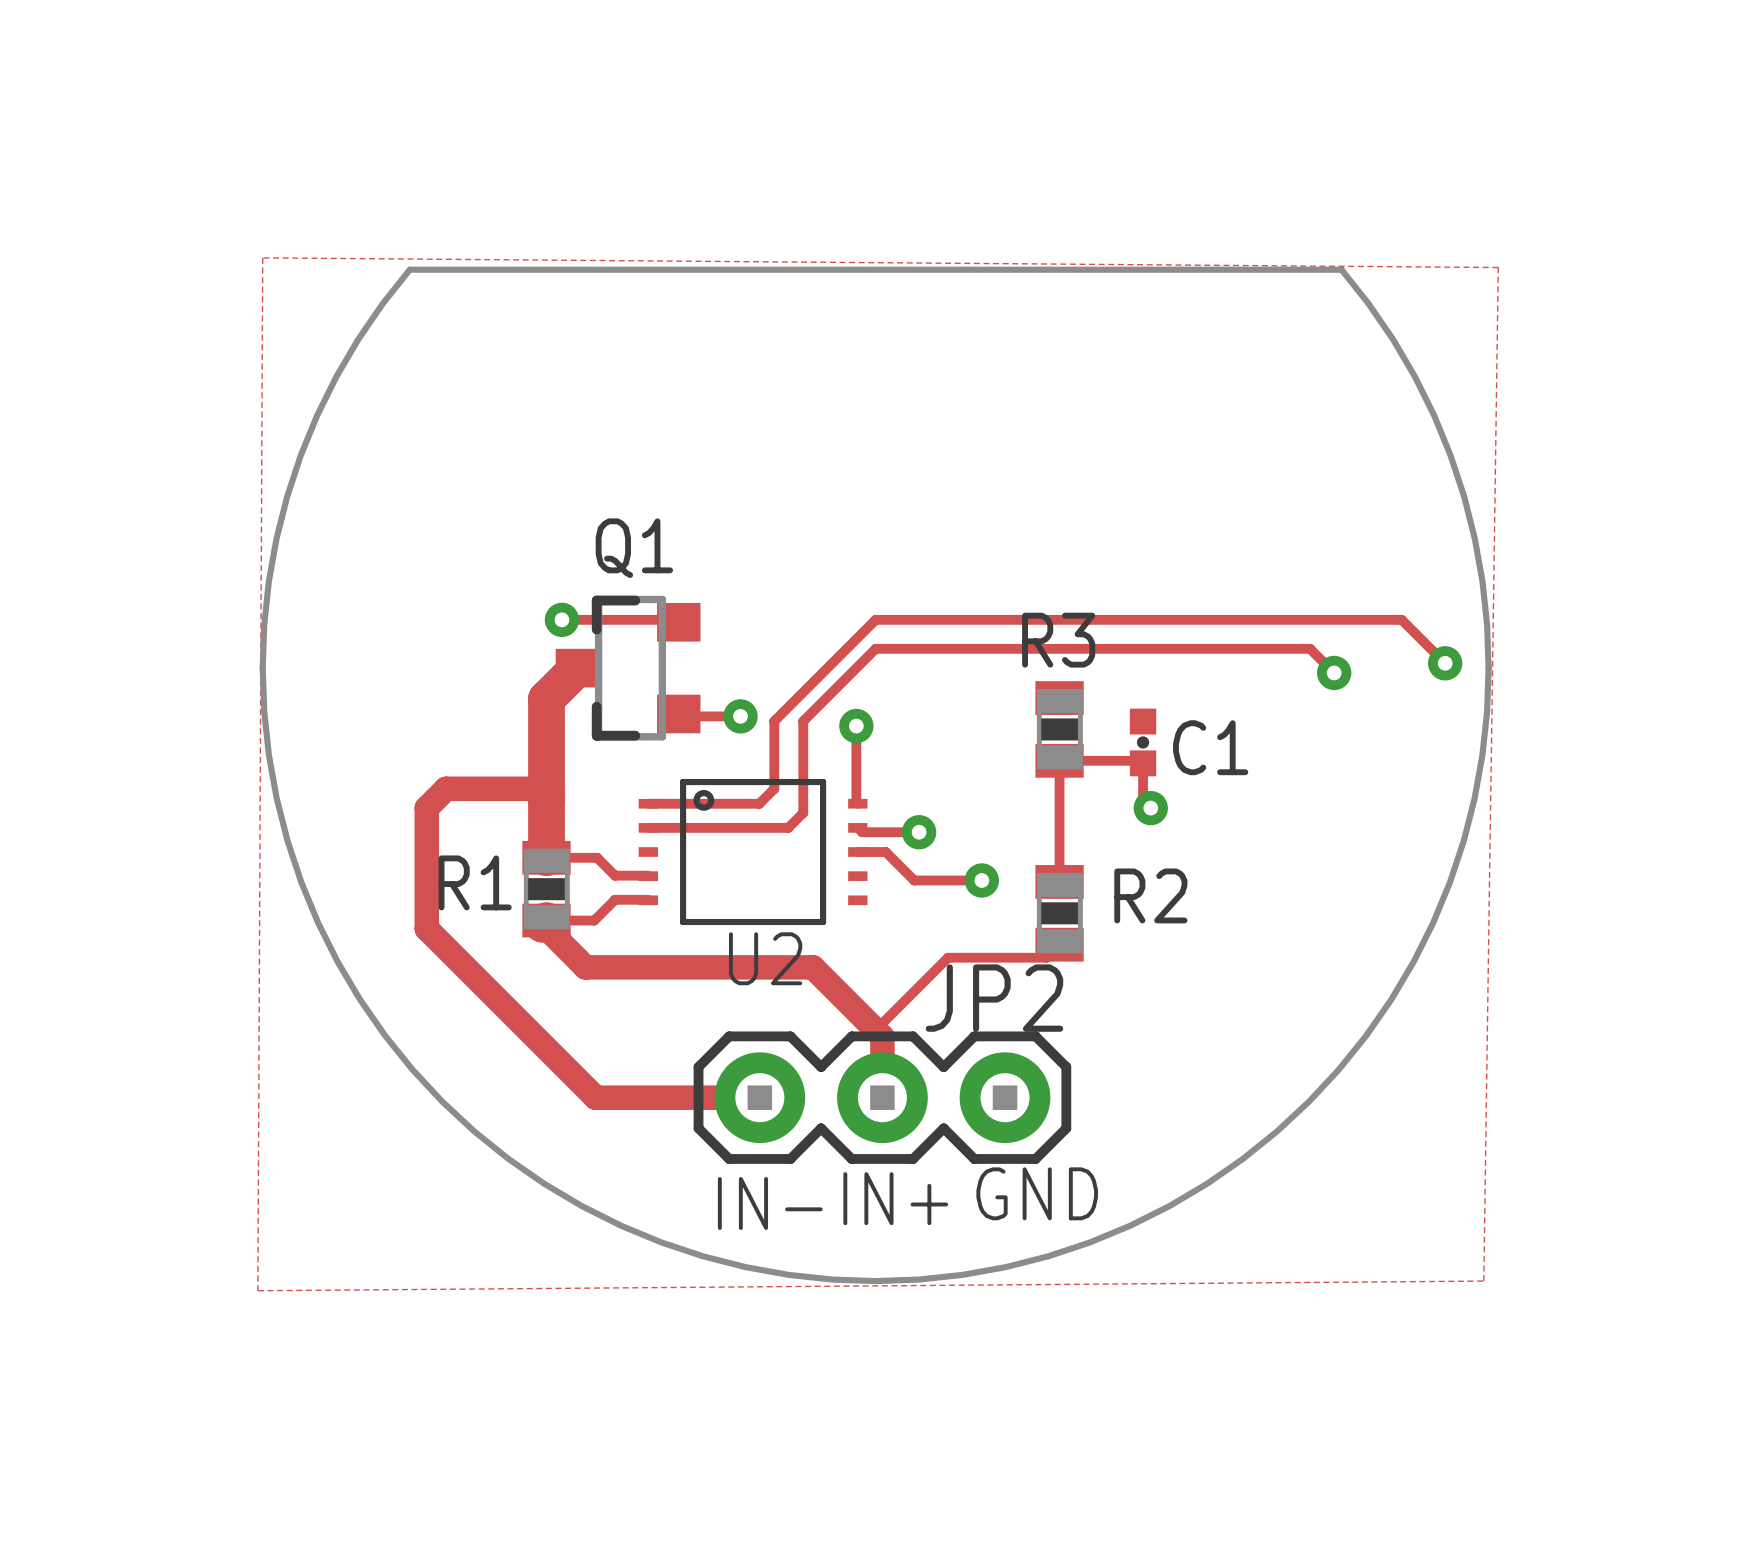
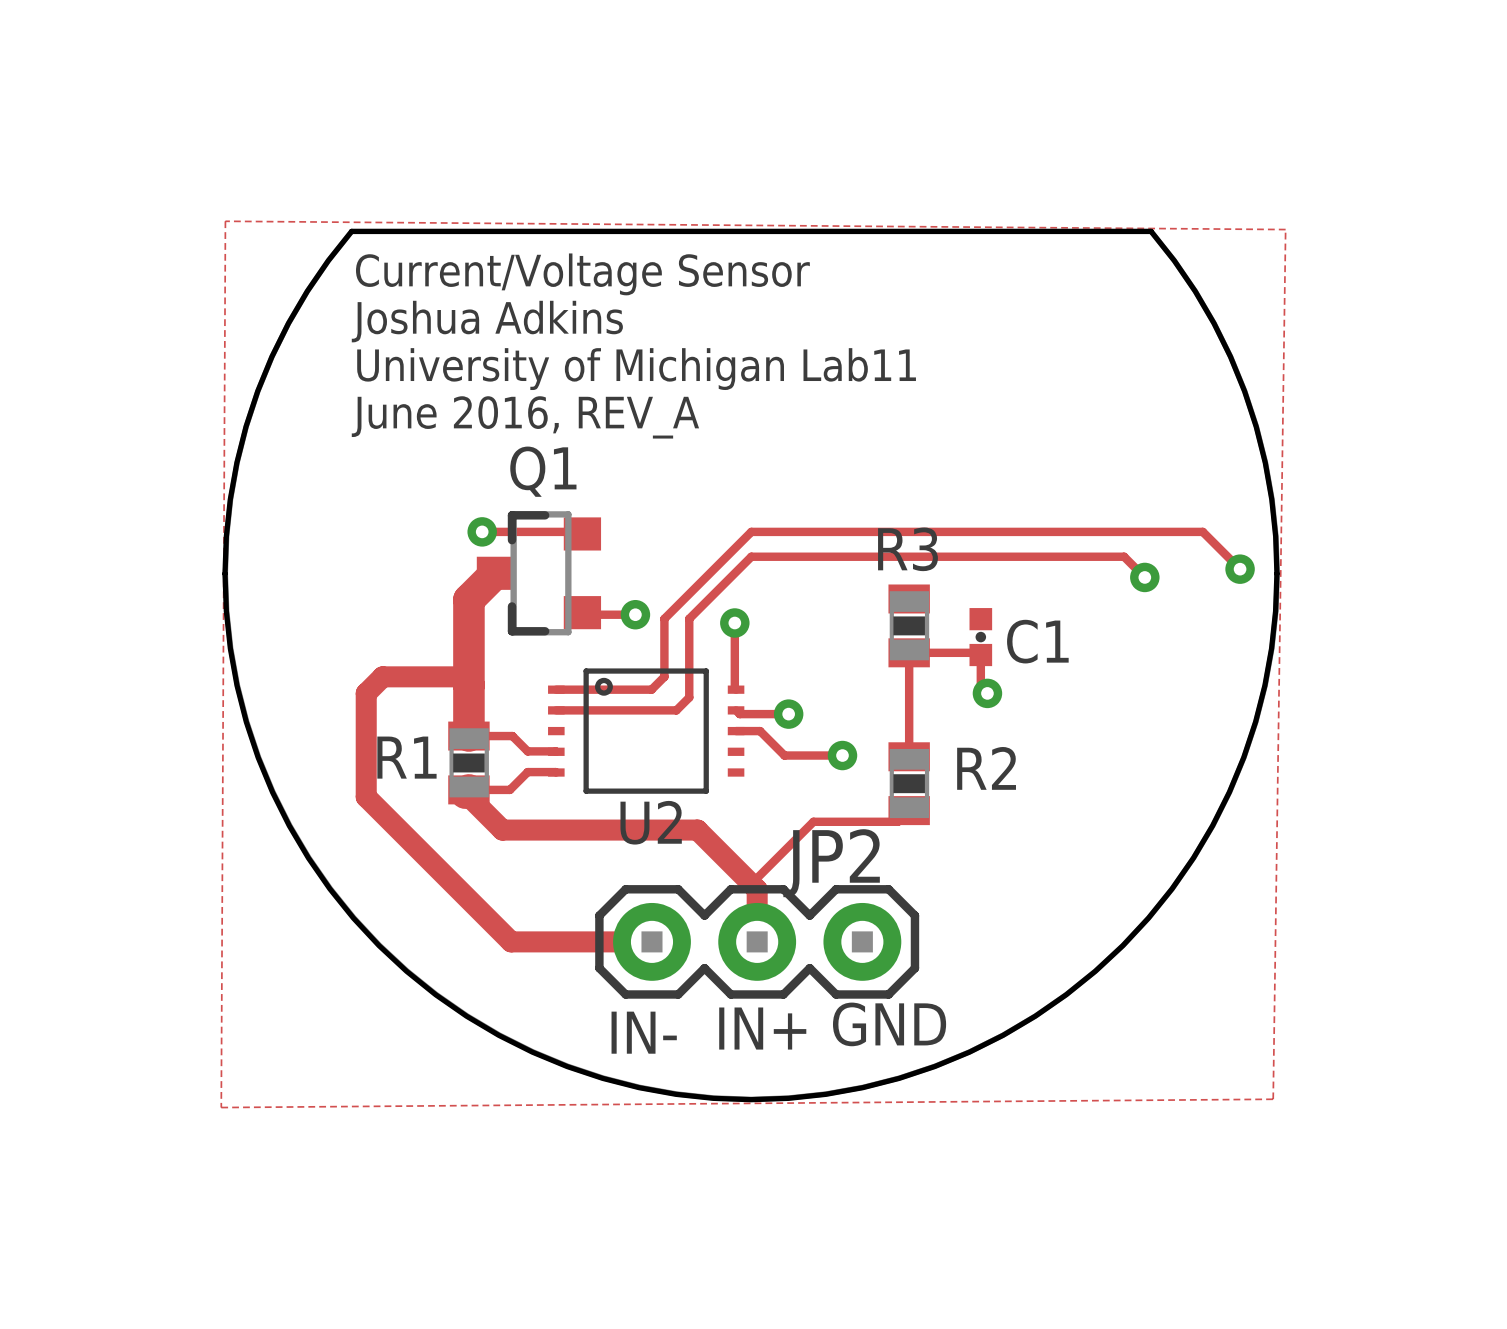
board edge: none -> (351, 231) (1151, 231) (1195, 291) (1214, 323) (1244, 391) (1265, 462) (1275, 536) (1276, 573) (1275, 611) (1264, 685) (1243, 757) (1212, 825) (1172, 888) (1148, 918) (1122, 945) (1066, 994) (1003, 1035) (934, 1066) (899, 1078) (862, 1087) (788, 1098) (750, 1099) (676, 1094) (639, 1087) (567, 1066) (498, 1035) (435, 994) (406, 971) (379, 945) (329, 888) (289, 825) (258, 757) (246, 721) (237, 685) (226, 611) (226, 536) (230, 499) (246, 426) (271, 356) (288, 323) (307, 291) (351, 231)
text: none -> Current/Voltage Sensor (582, 274)
text: none -> Joshua Adkins (487, 321)
text: none -> University of Michigan Lab11 (636, 369)
text: none -> June 2016, REV_A (525, 417)

